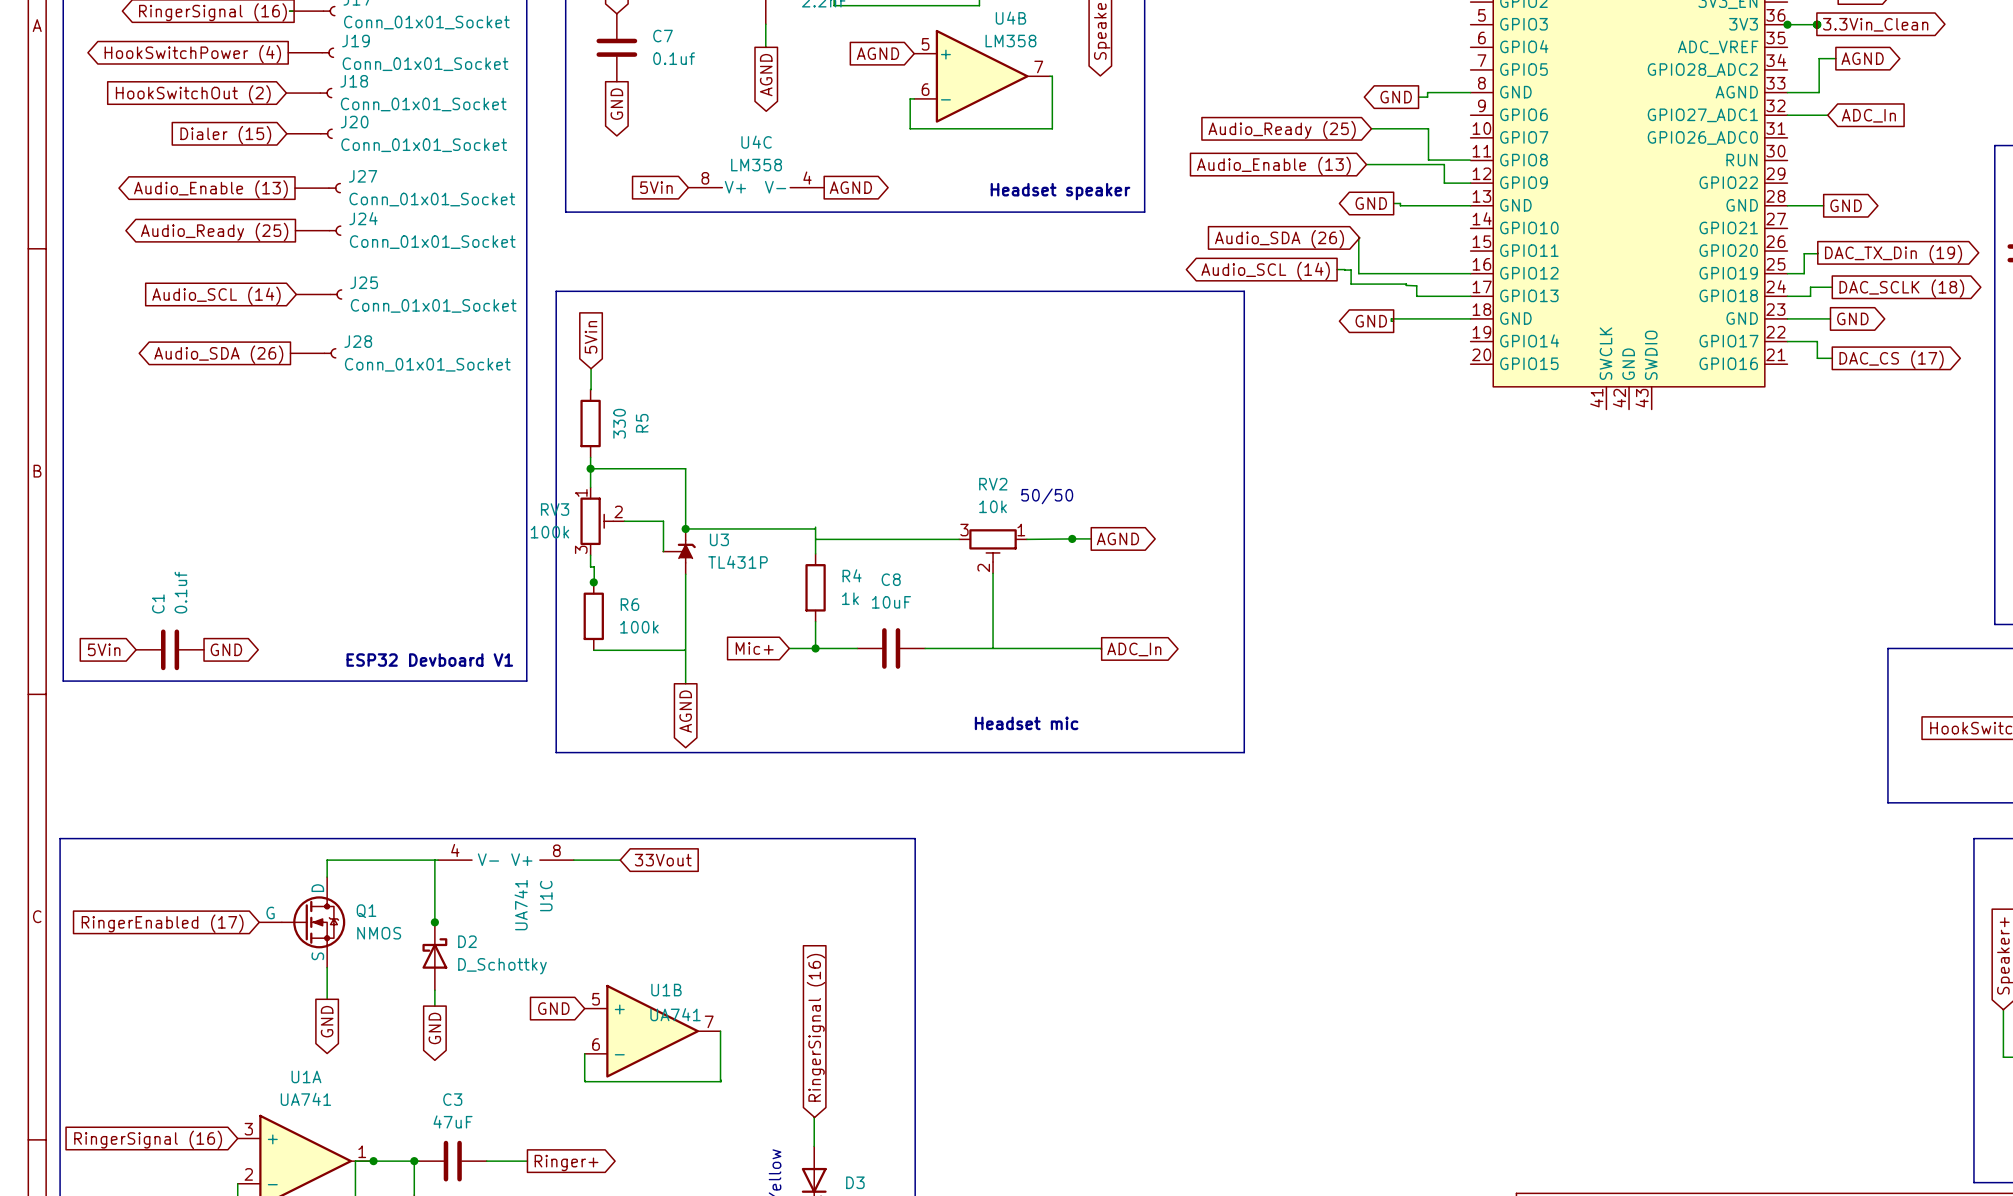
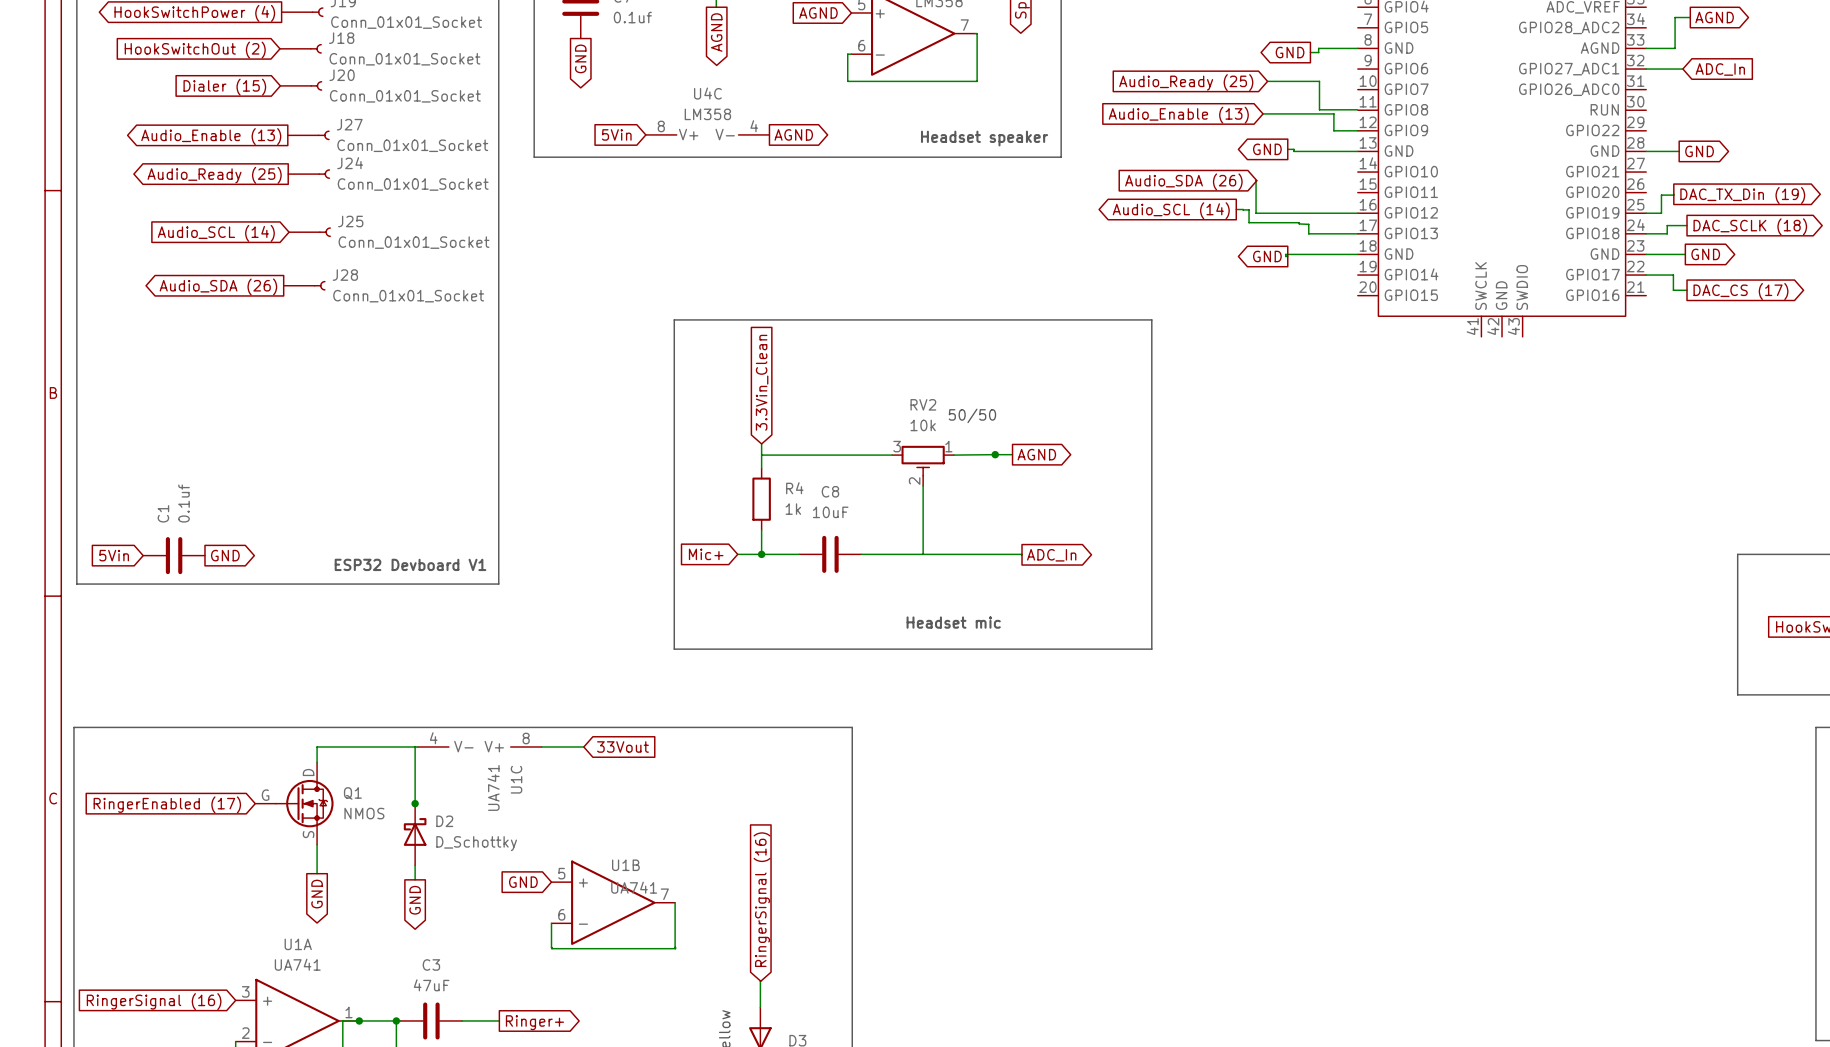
global label: 5Vin (591, 337) -> none
wire: (591, 368) (590, 389) -> none
line: (1244, 390) (1244, 291) (556, 291) (556, 752) (719, 752) -> (1151, 319) (674, 319) (674, 649)
R5: 330 (590, 423) -> none
wire: (590, 457) (590, 487) -> none
global label: none -> 3.3Vin_Clean (762, 382)
wire: (590, 468) (685, 468) (685, 528) (815, 528) -> none
junction: (590, 468) -> none
RV3: 100k (602, 521) -> none
wire: (624, 521) (663, 521) (663, 551) -> none
junction: (685, 528) -> none
U3: TL431P (679, 551) -> none
wire: (590, 555) (590, 566) (594, 566) (593, 582) -> none
wire: (685, 574) (685, 683) -> none
junction: (593, 582) -> none
R6: 100k (593, 616) -> none
wire: (685, 649) (593, 650) -> none
global label: AGND (685, 711) -> none

